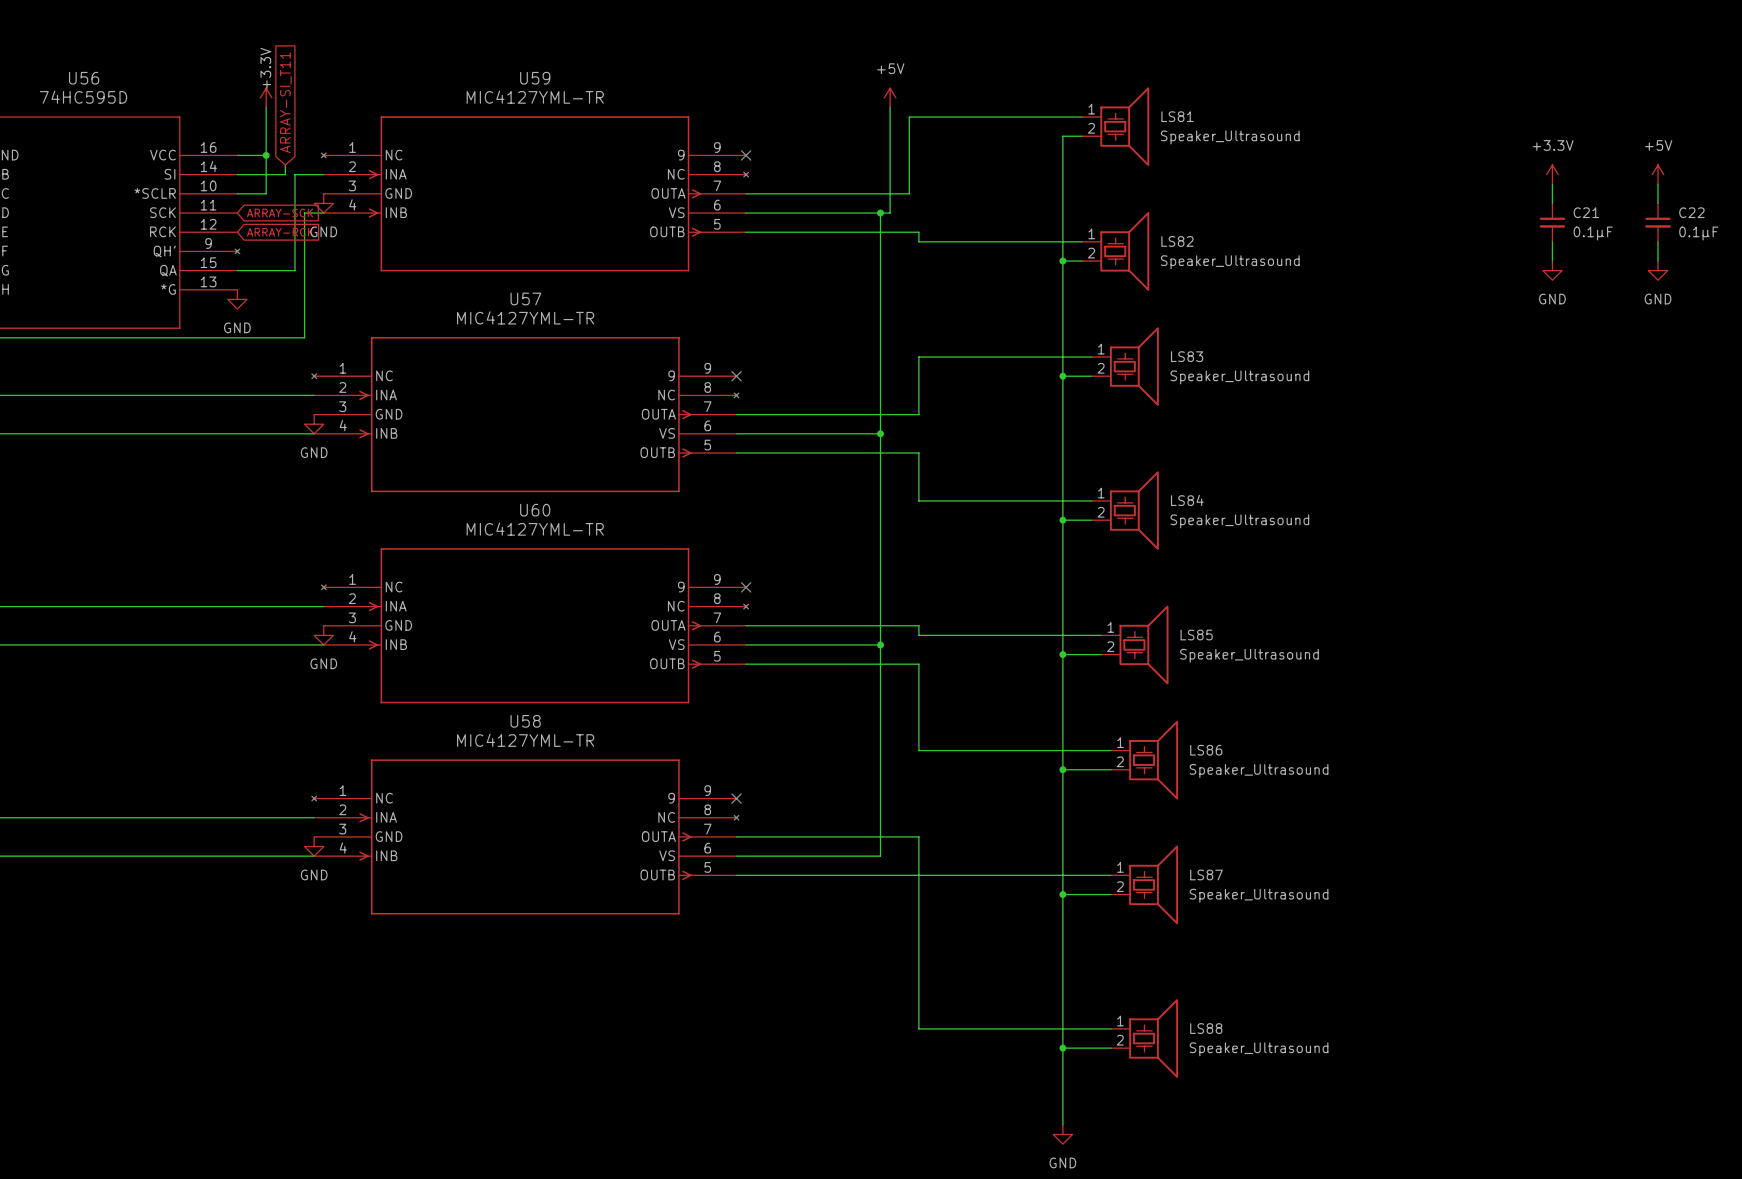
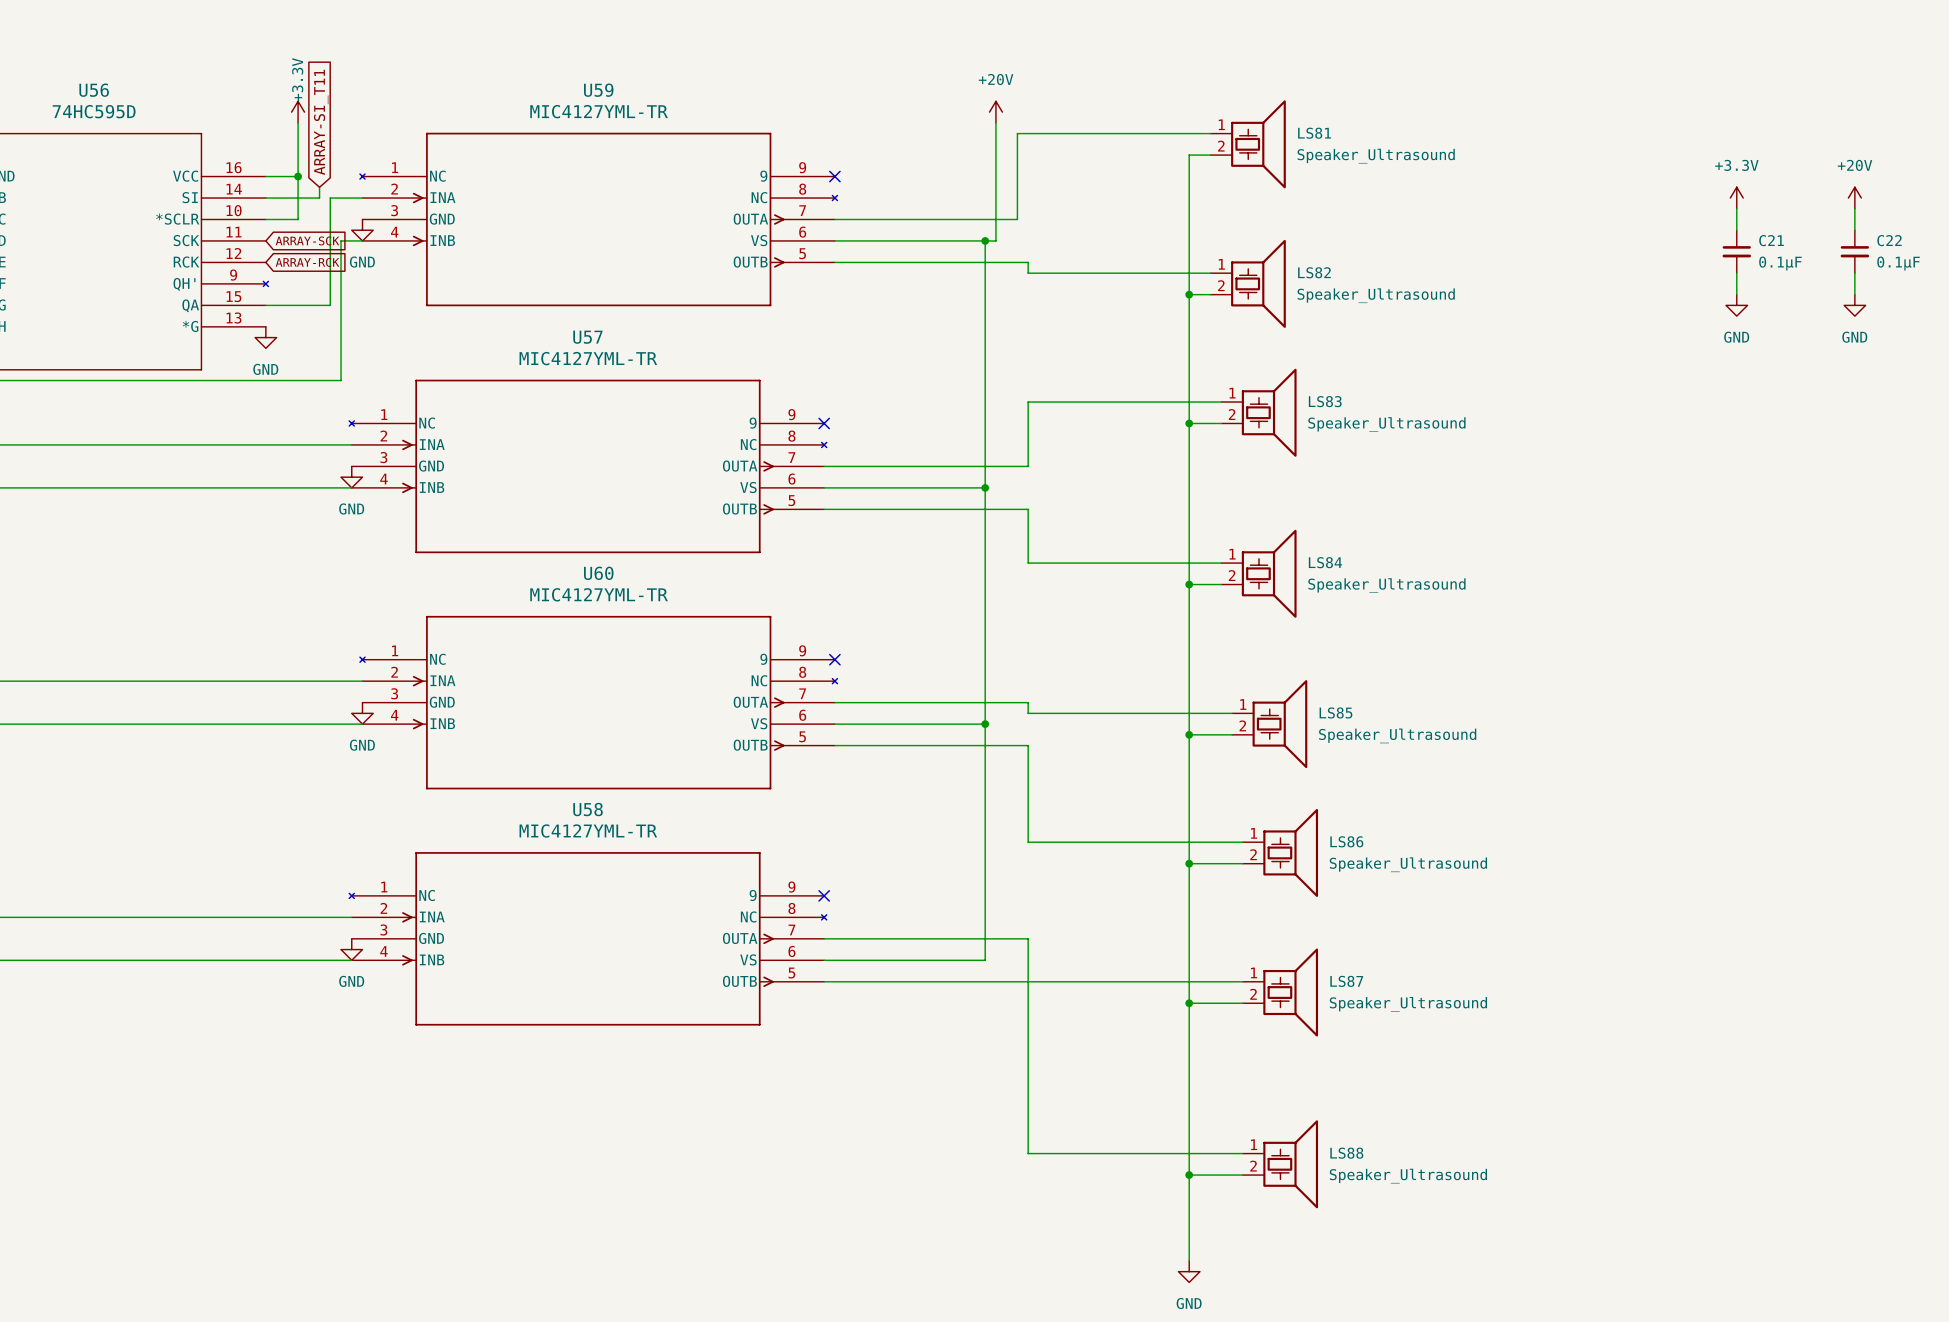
power symbol: +5V (890, 97) -> +20V (995, 112)
power symbol: +5V (1658, 174) -> +20V (1854, 198)

